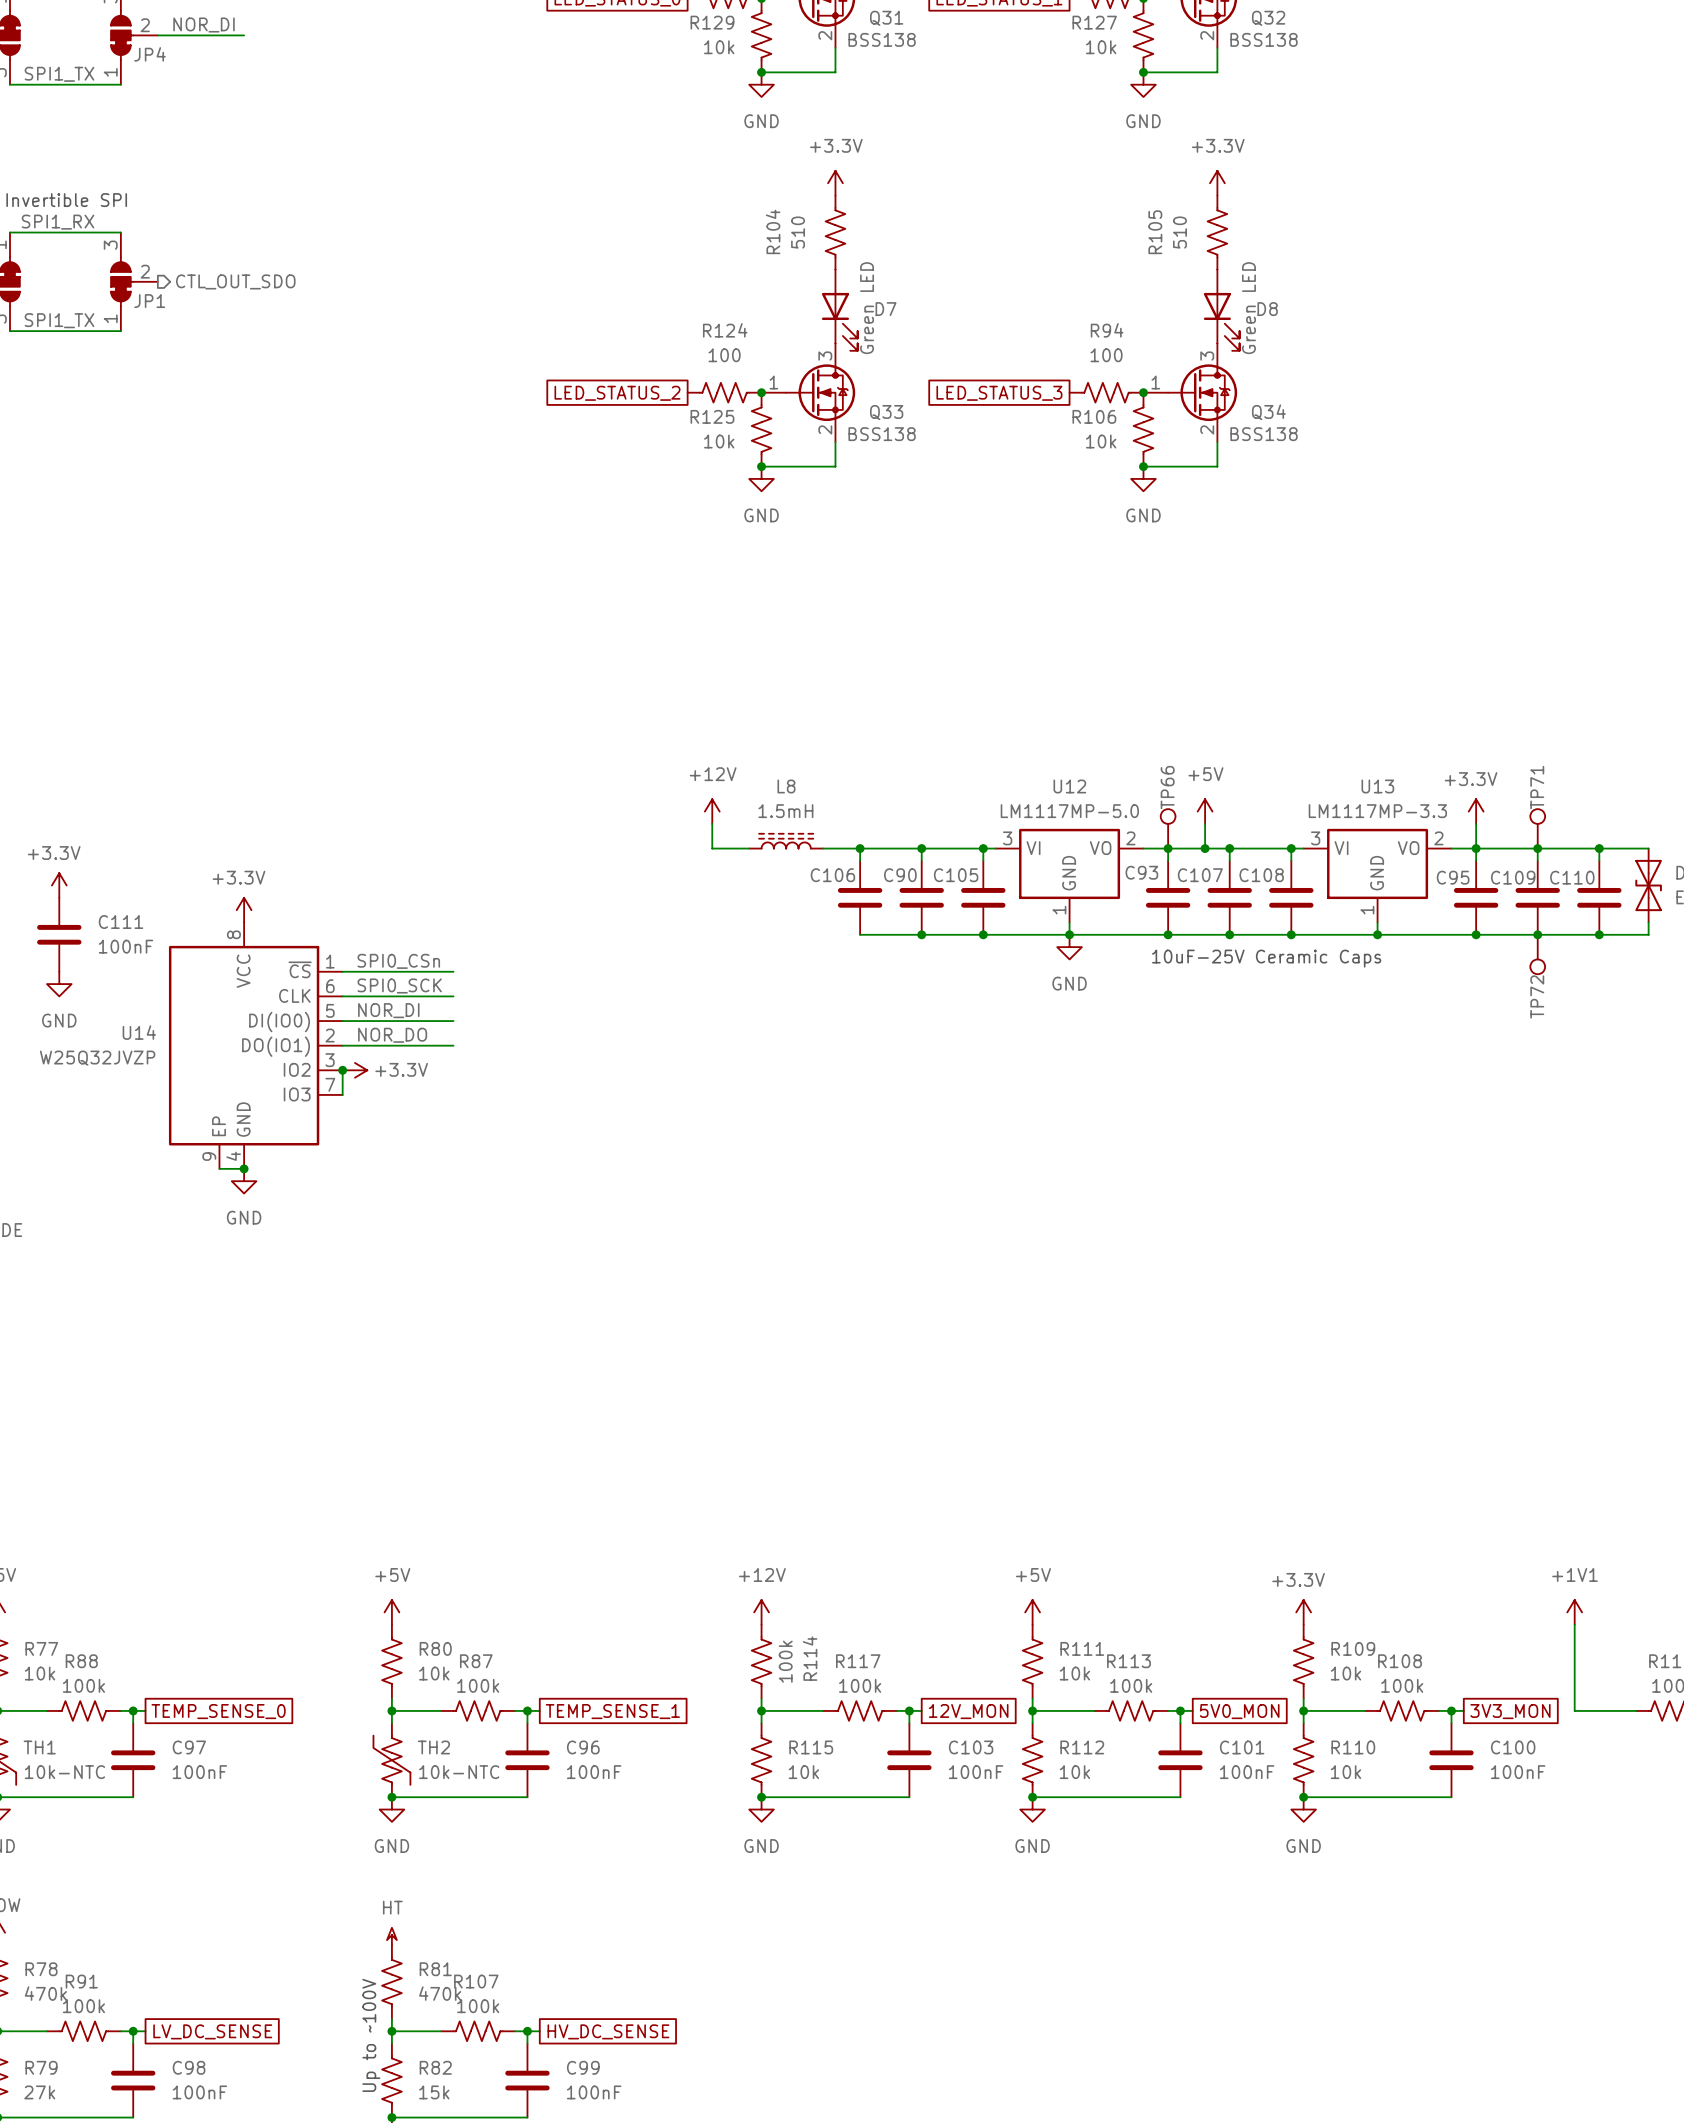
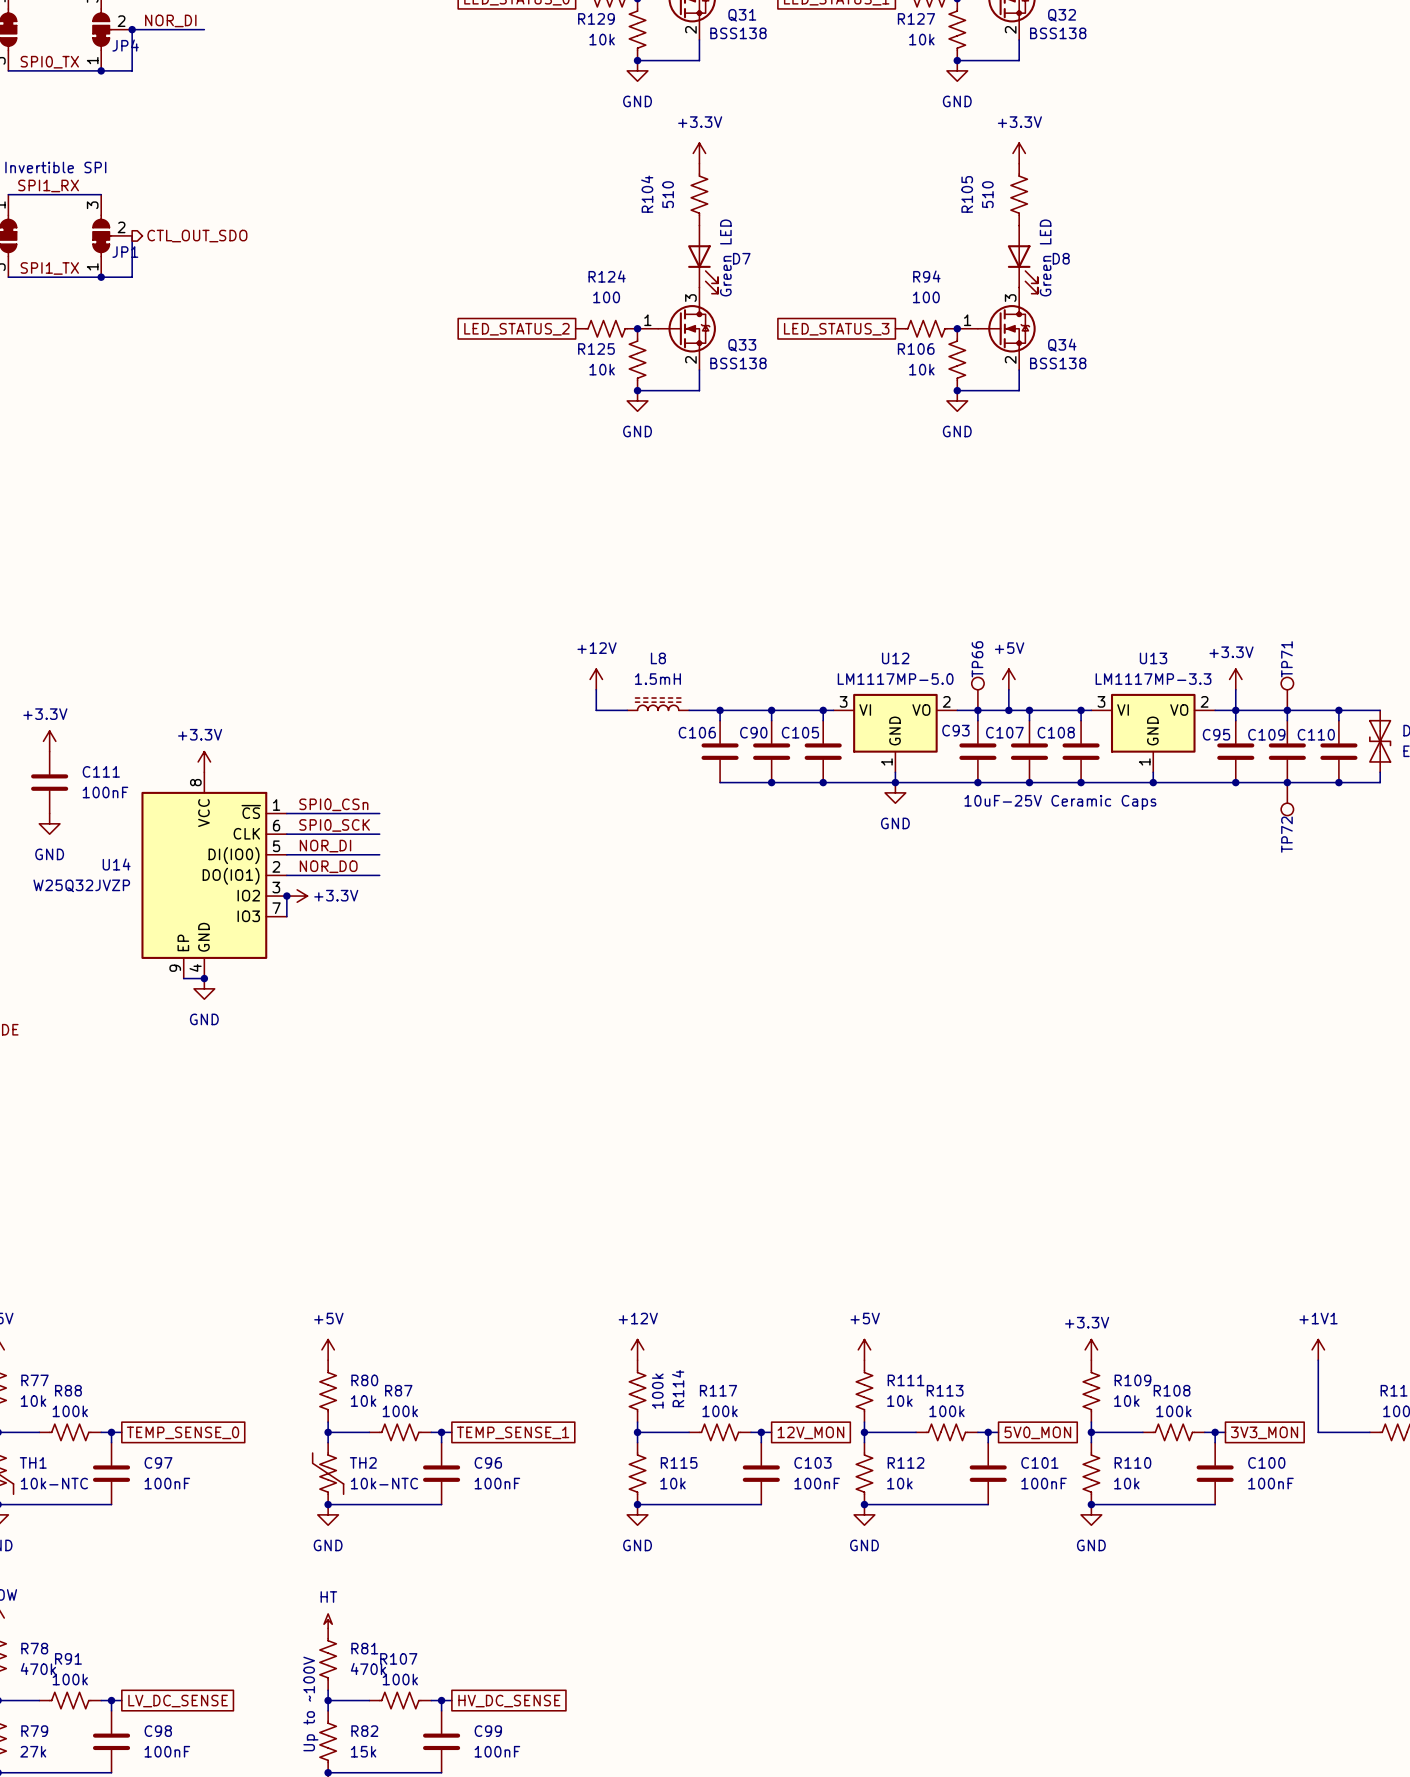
wire: none -> (132, 29) (132, 70) (101, 70)
junction: none -> (132, 29)
label: SPI1_TX (59, 74) -> SPI0_TX (49, 62)
junction: none -> (101, 70)
wire: none -> (132, 235) (132, 277) (101, 277)
junction: none -> (101, 277)

